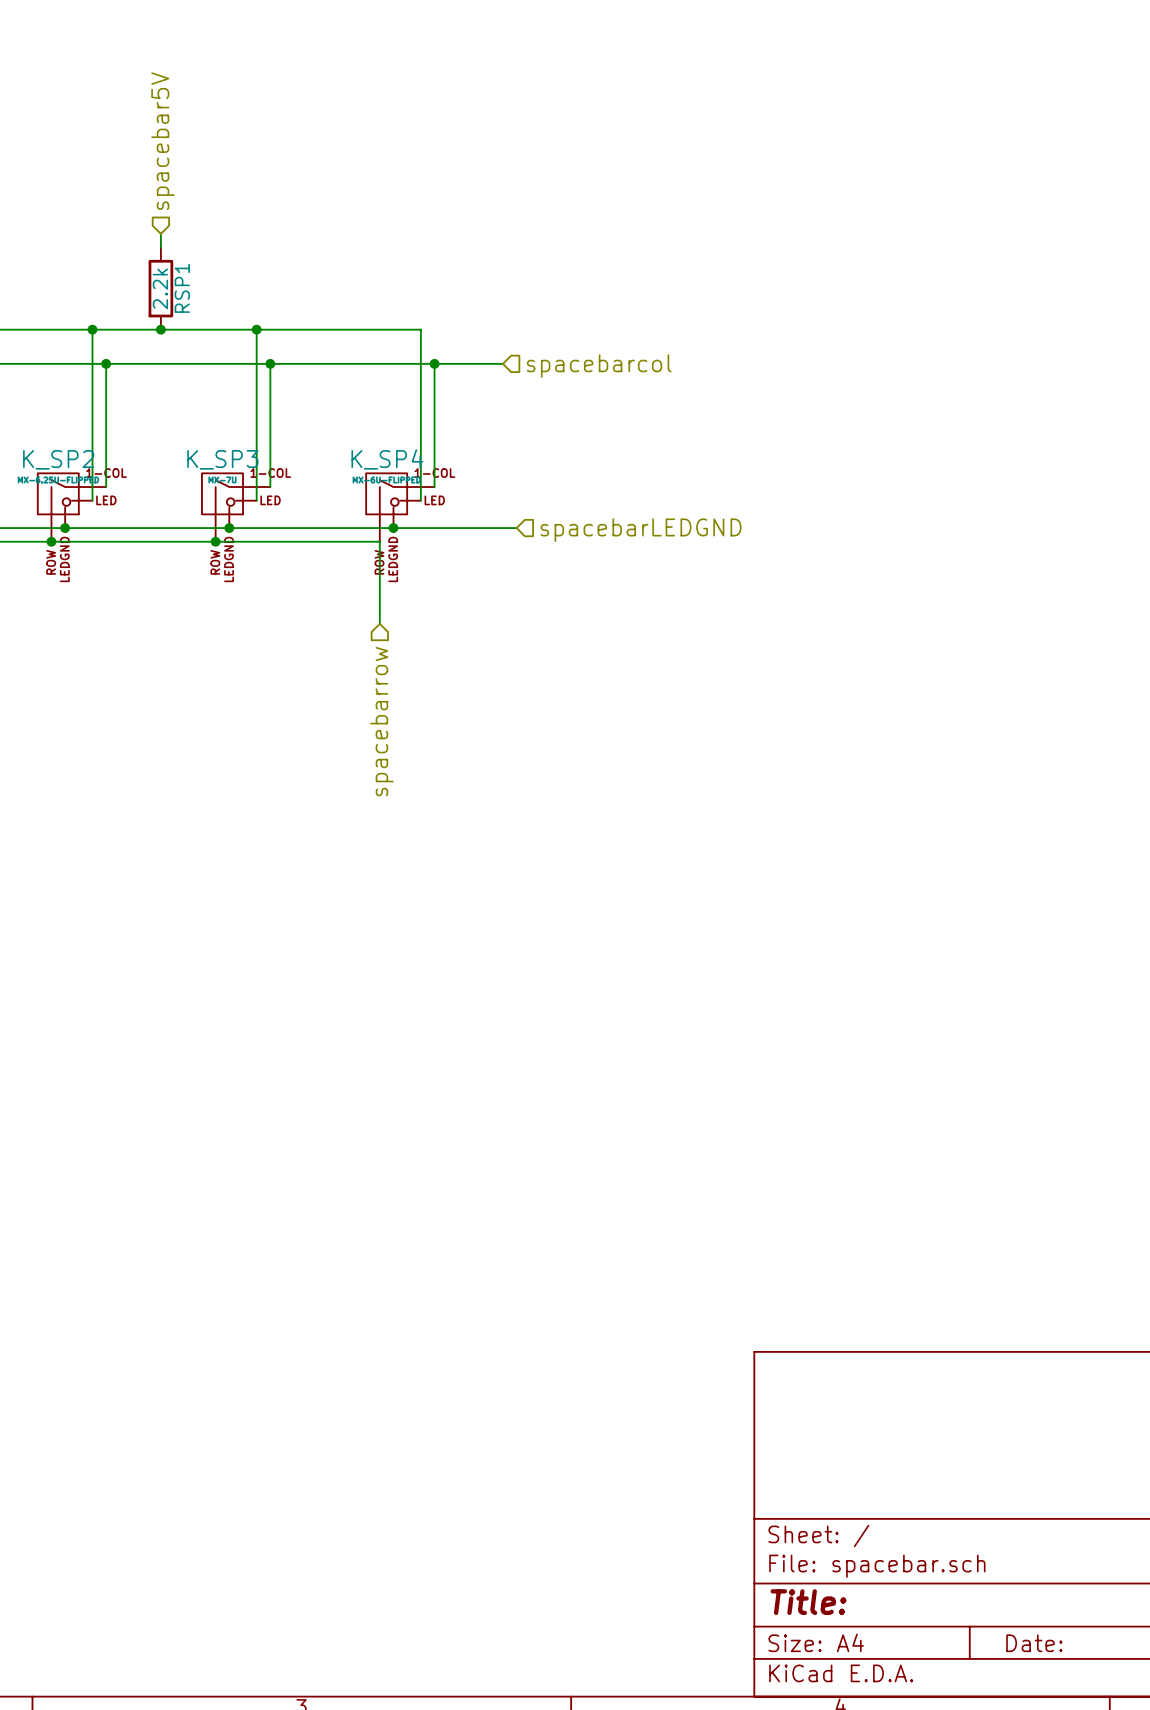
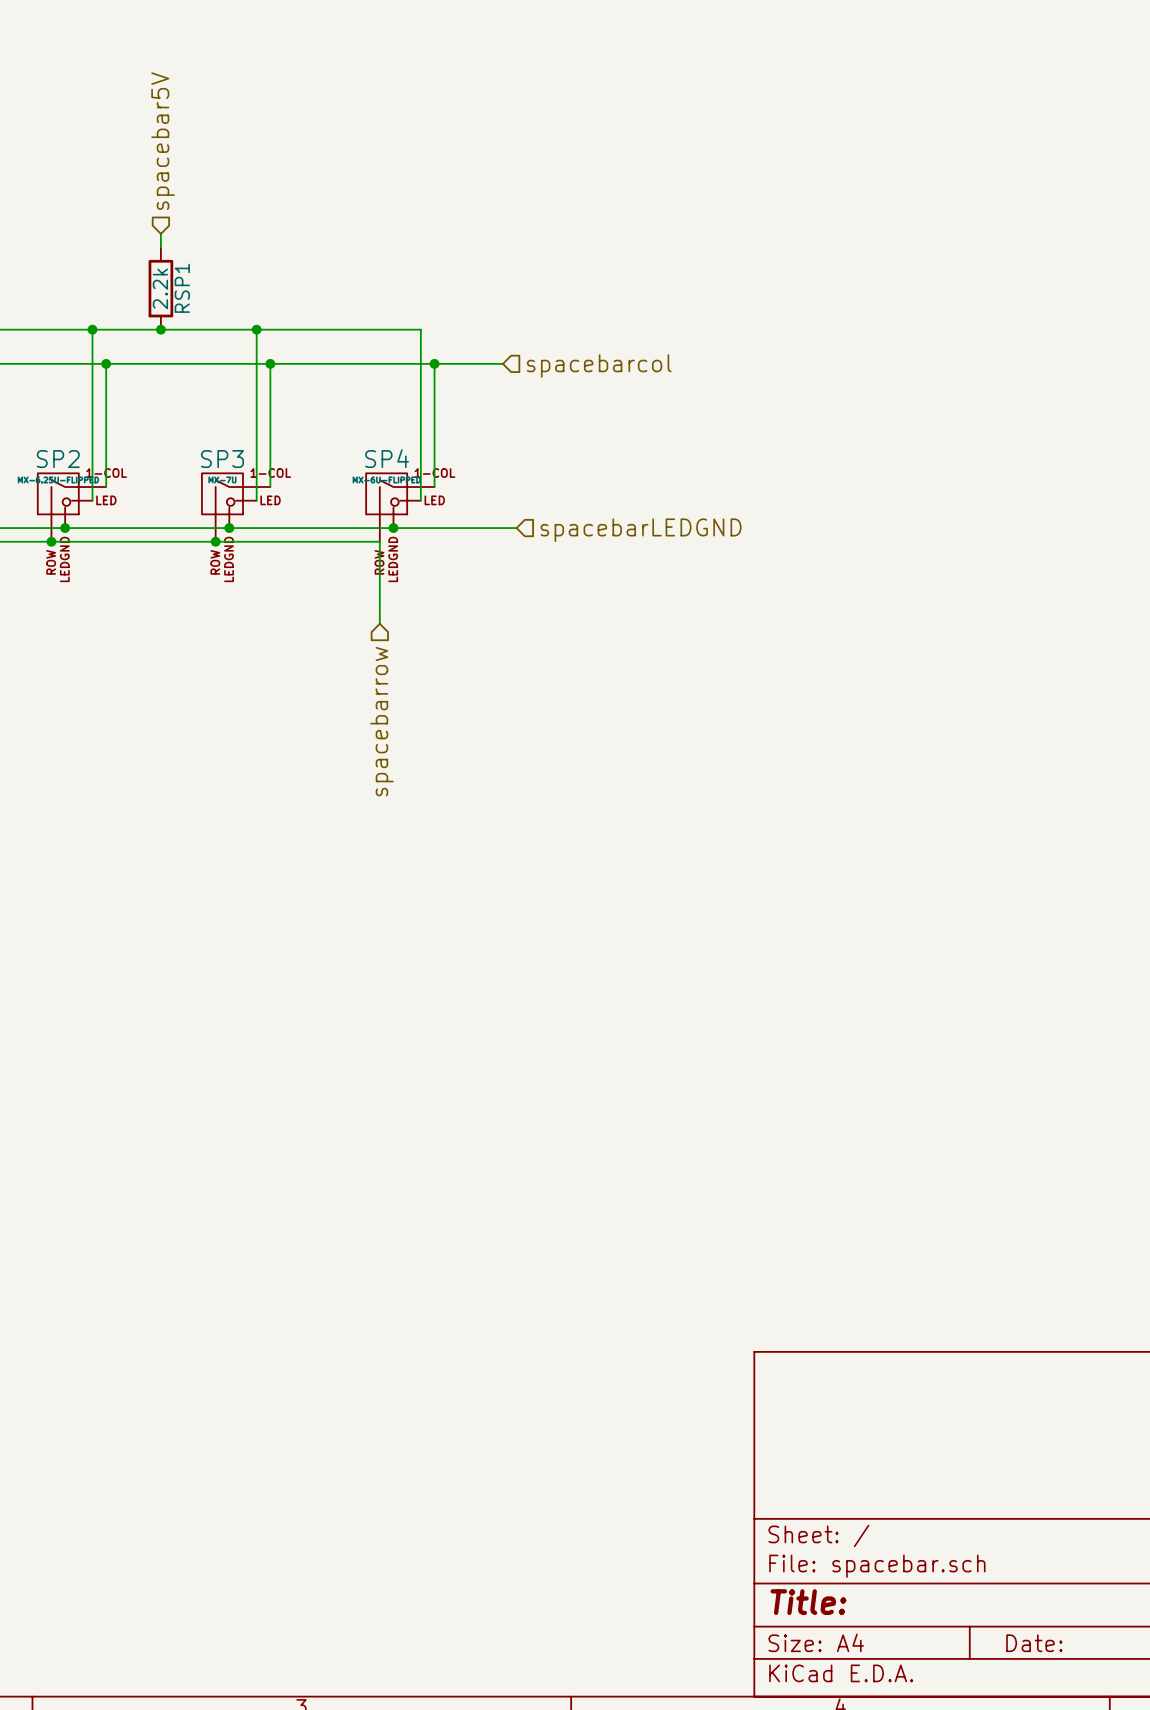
K_SP2 name: K_SP2 (58, 459) -> SP2 (58, 459)
K_SP3 name: K_SP3 (222, 459) -> SP3 (222, 459)
K_SP4 name: K_SP4 (387, 459) -> SP4 (387, 458)

